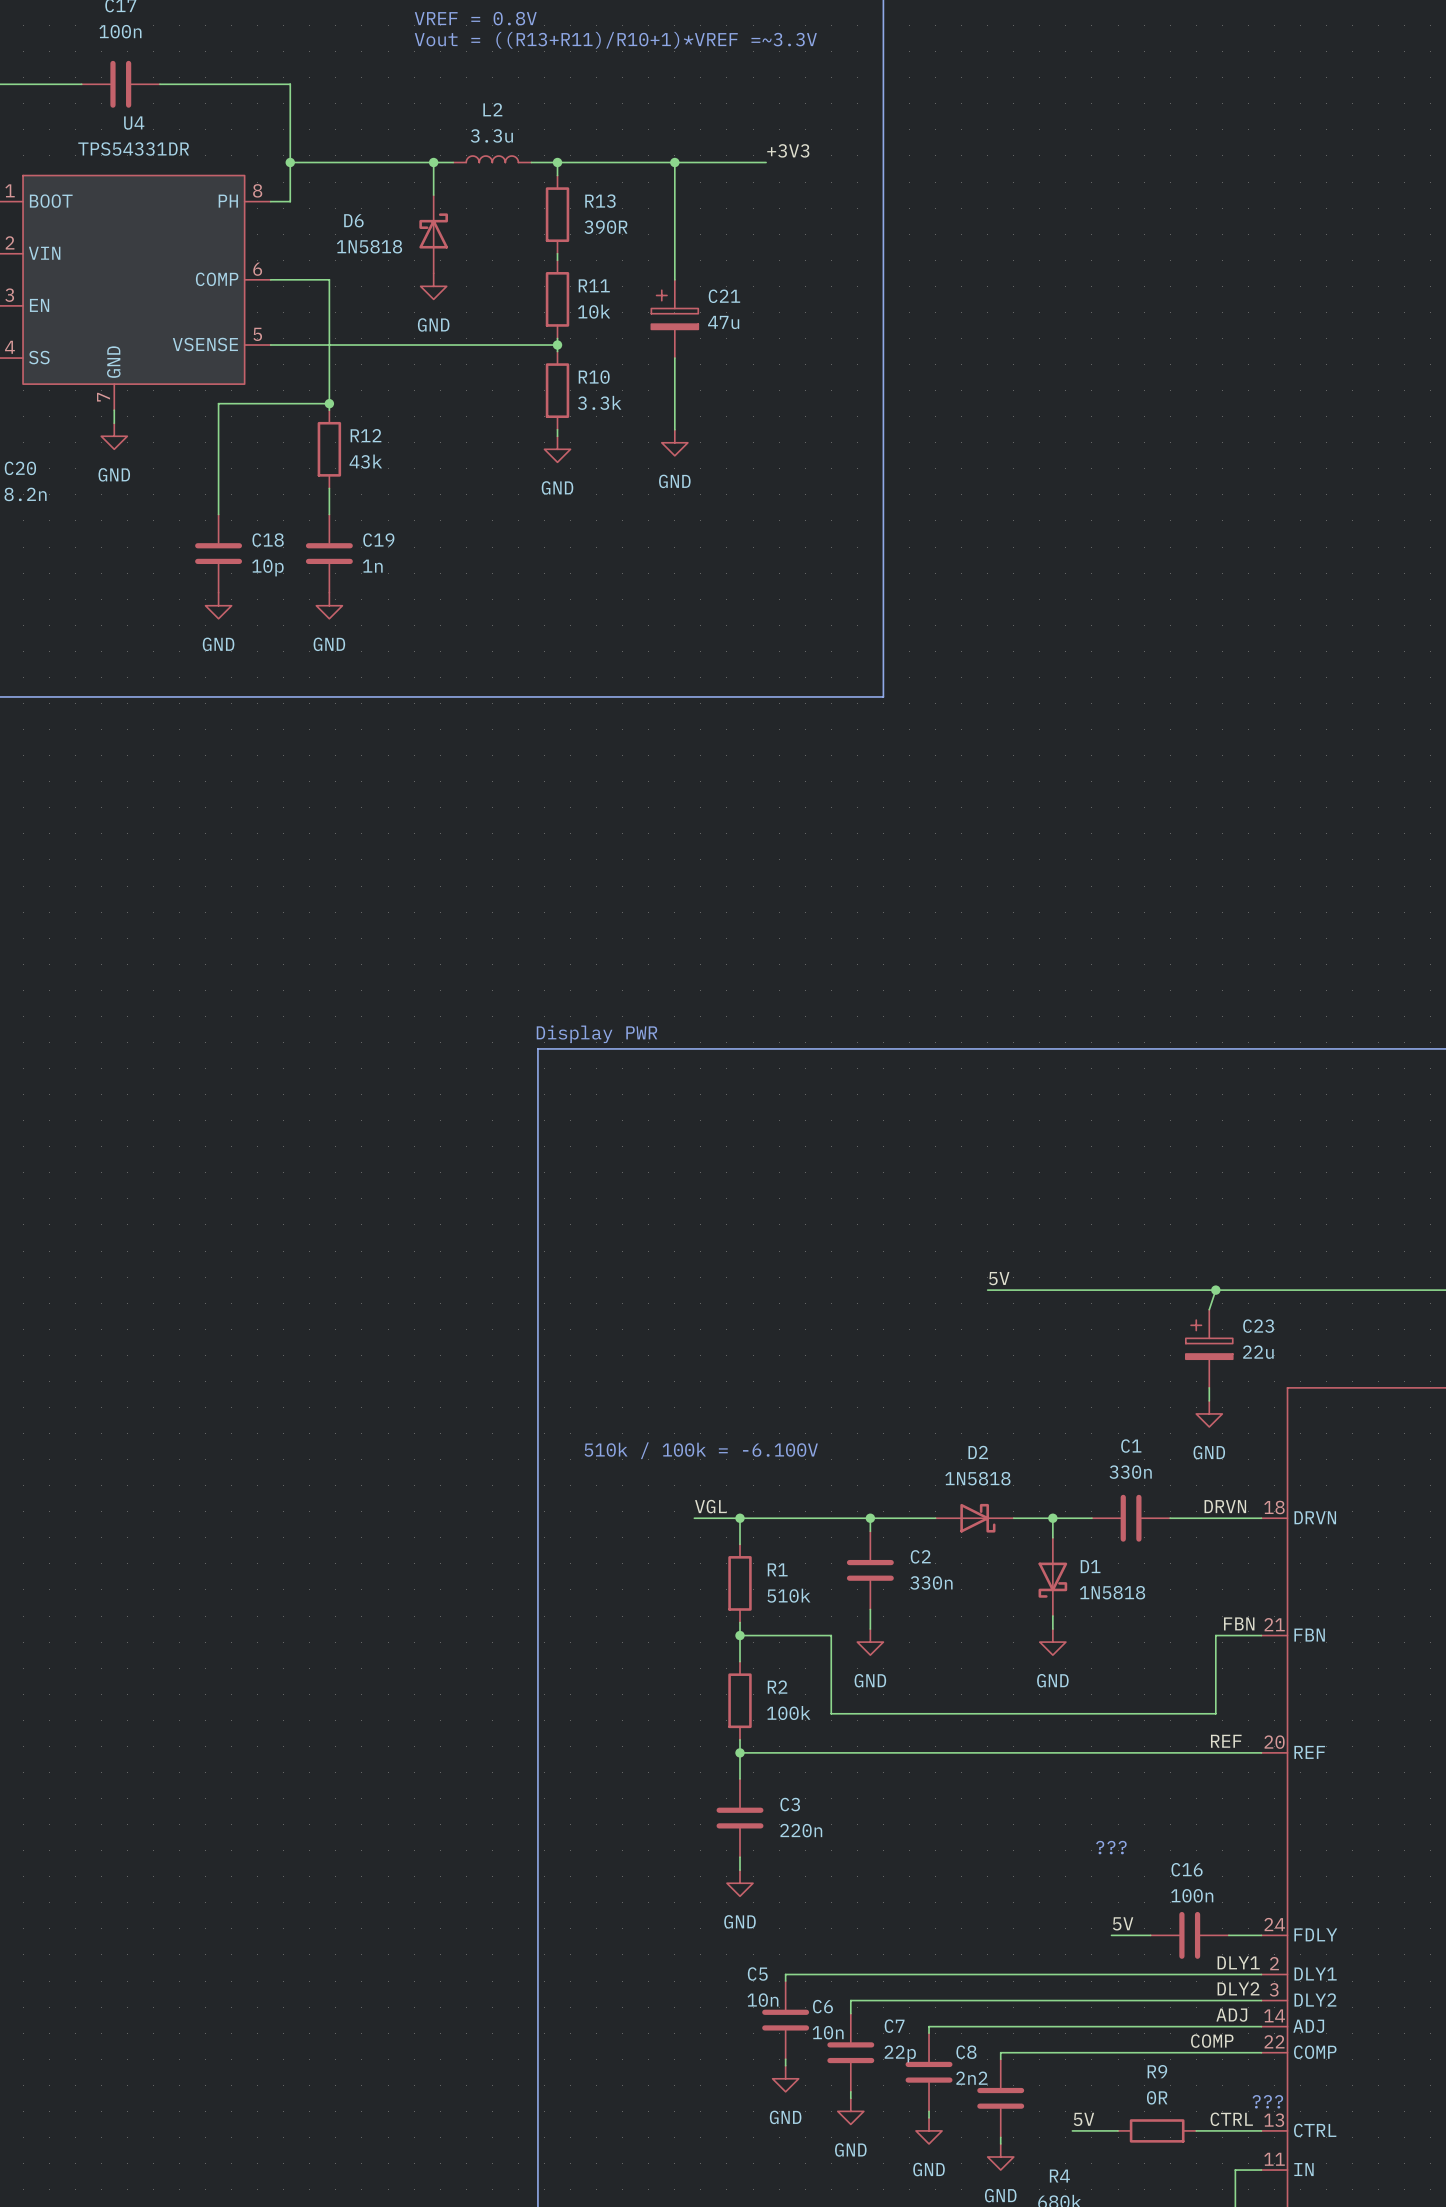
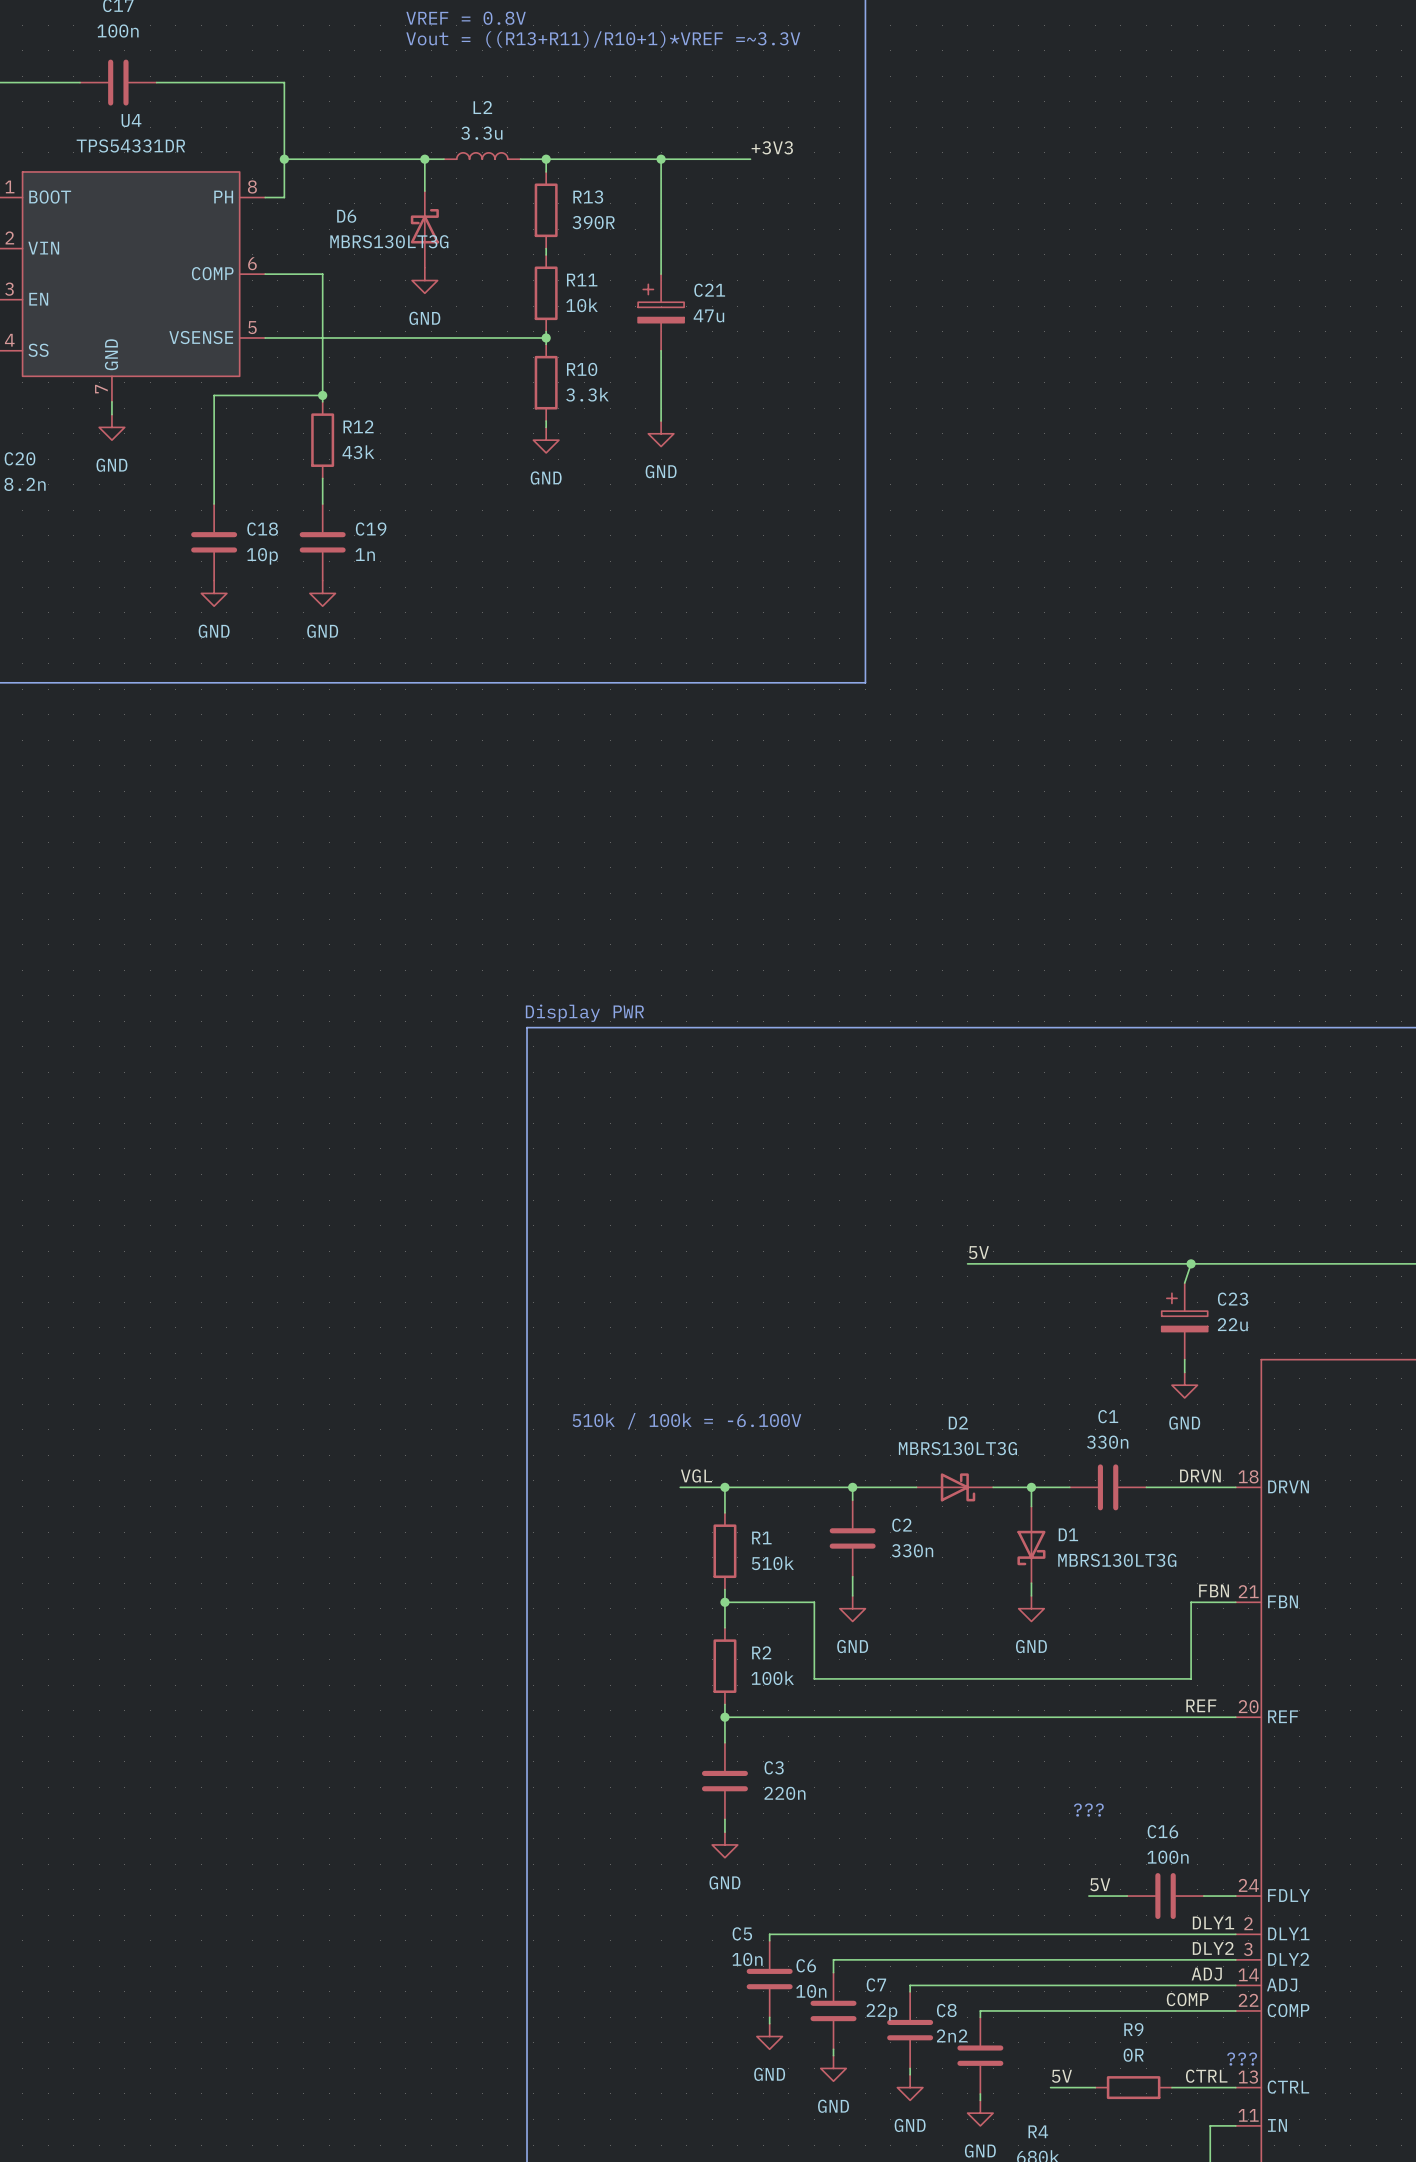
D6 value: 1N5818 (369, 246) -> MBRS130LT3G (389, 241)
D2 value: 1N5818 (977, 1478) -> MBRS130LT3G (957, 1448)
D1 value: 1N5818 (1112, 1592) -> MBRS130LT3G (1117, 1560)

